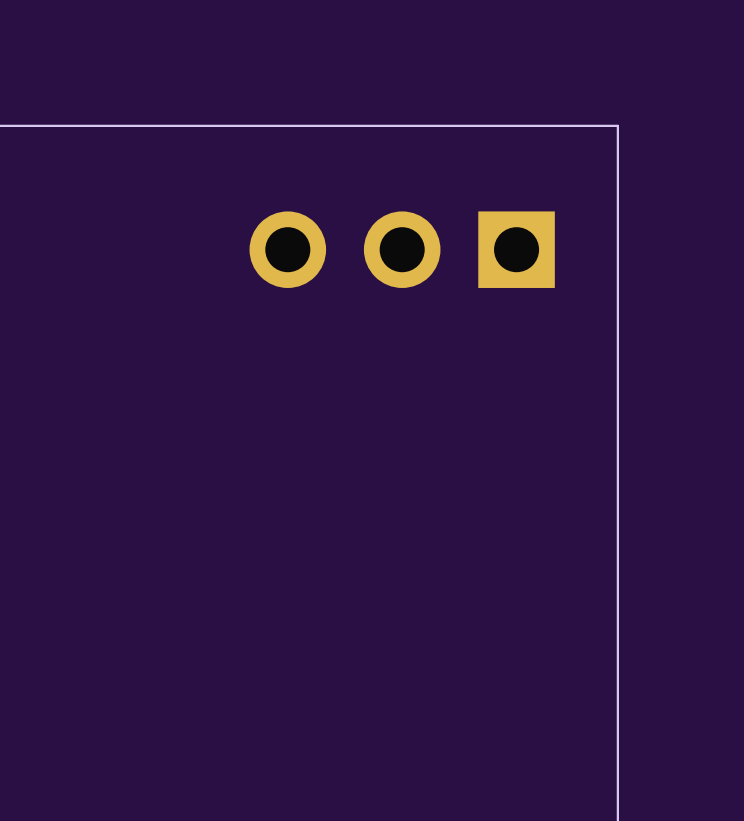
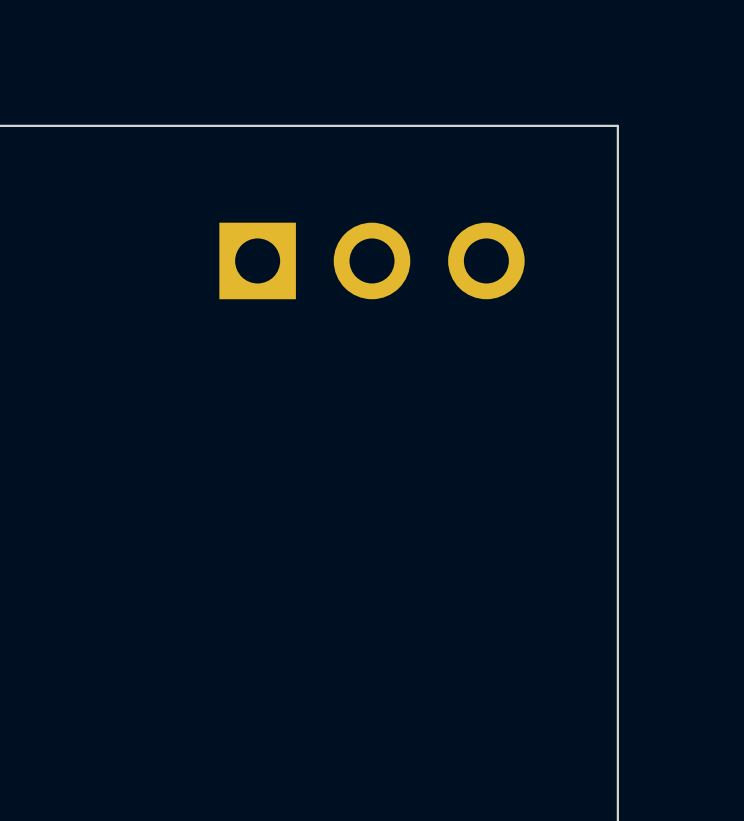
part rotation: 0° (402, 249) -> 180° (372, 260)

